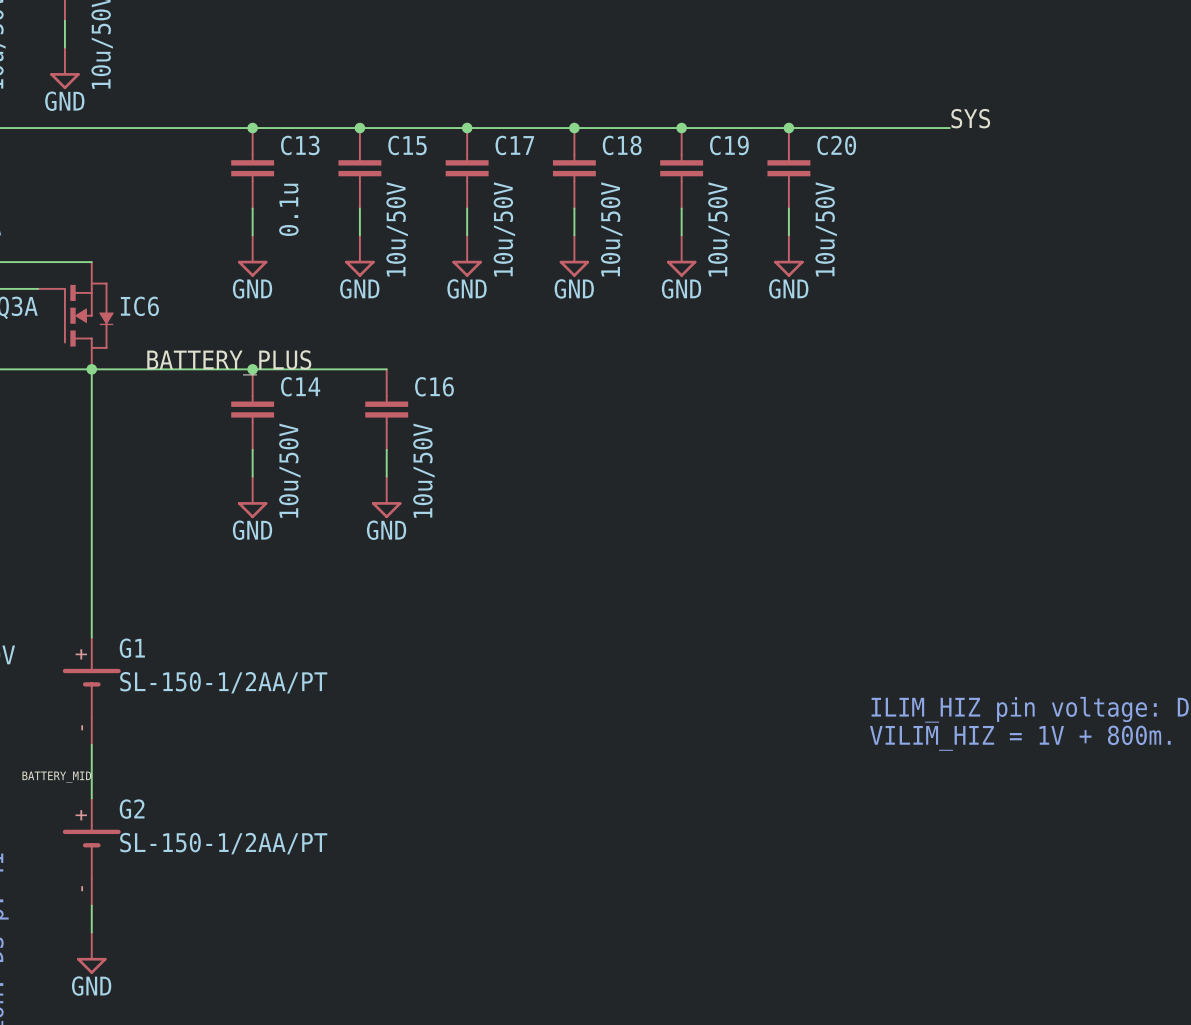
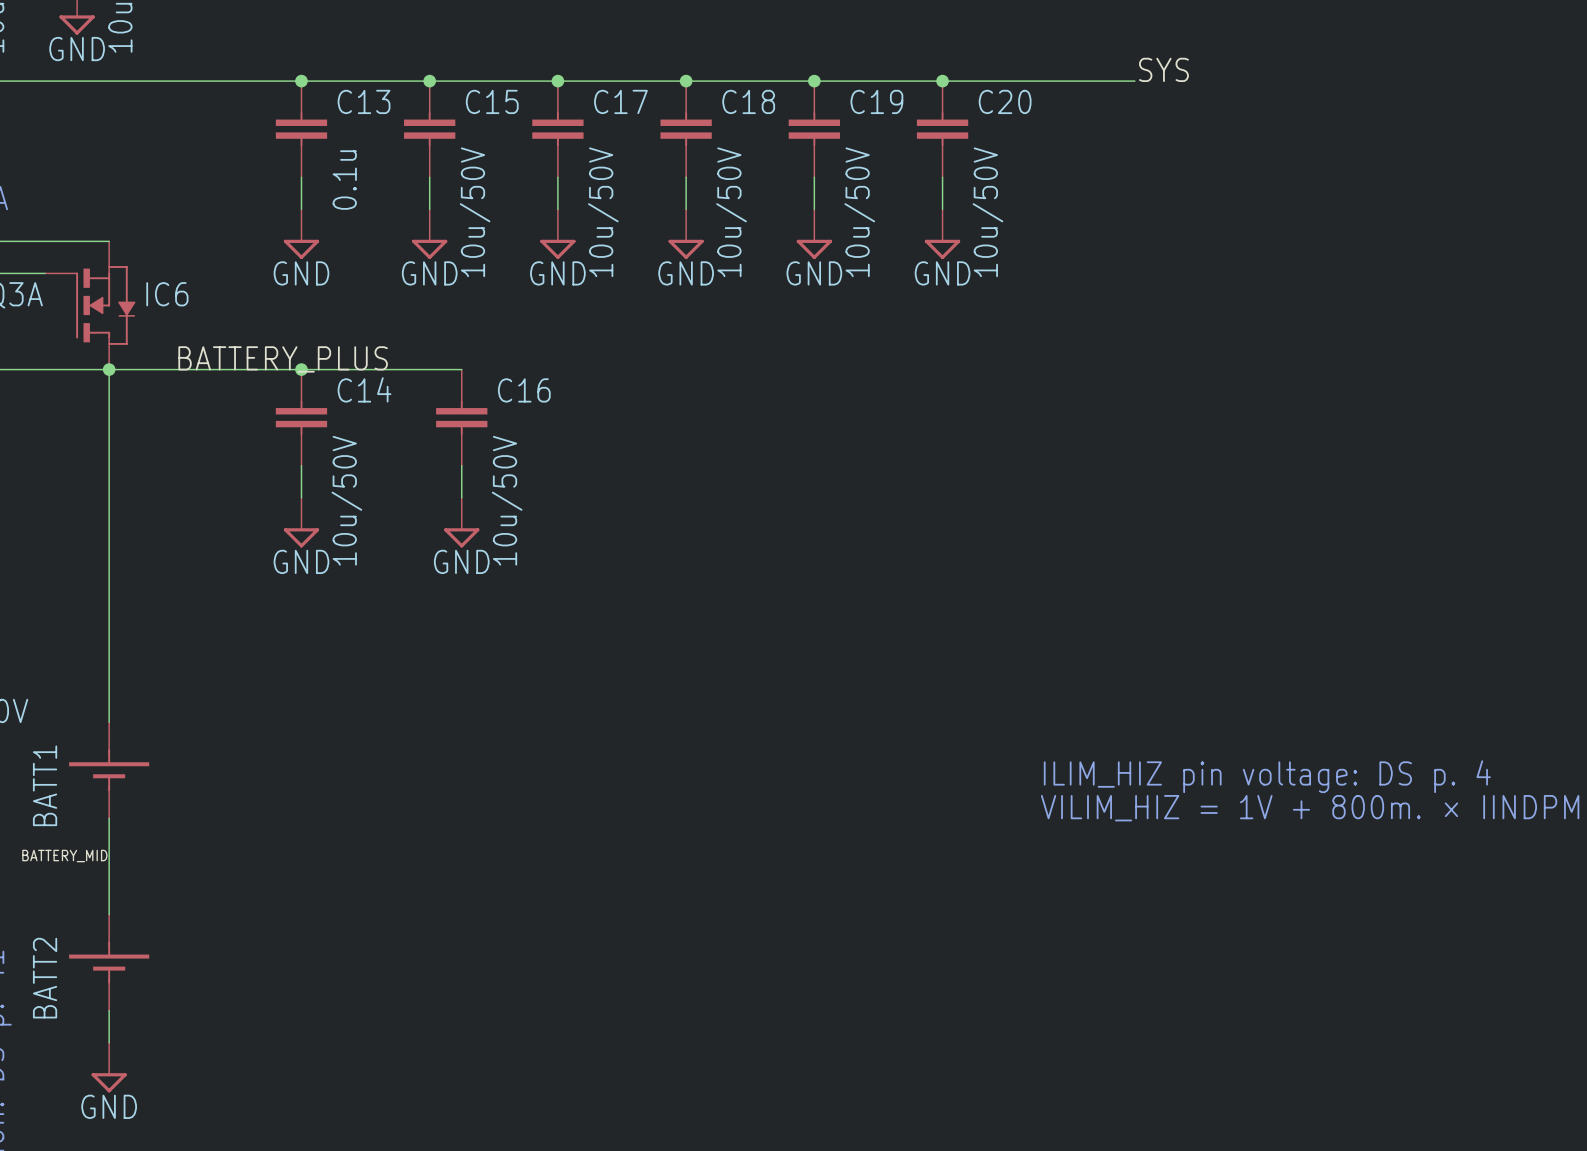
G1: SL-150-1/2AA/PT (91, 691) -> none
BATT1: none -> (109, 770)
G2: SL-150-1/2AA/PT (91, 851) -> none
BATT2: none -> (109, 962)

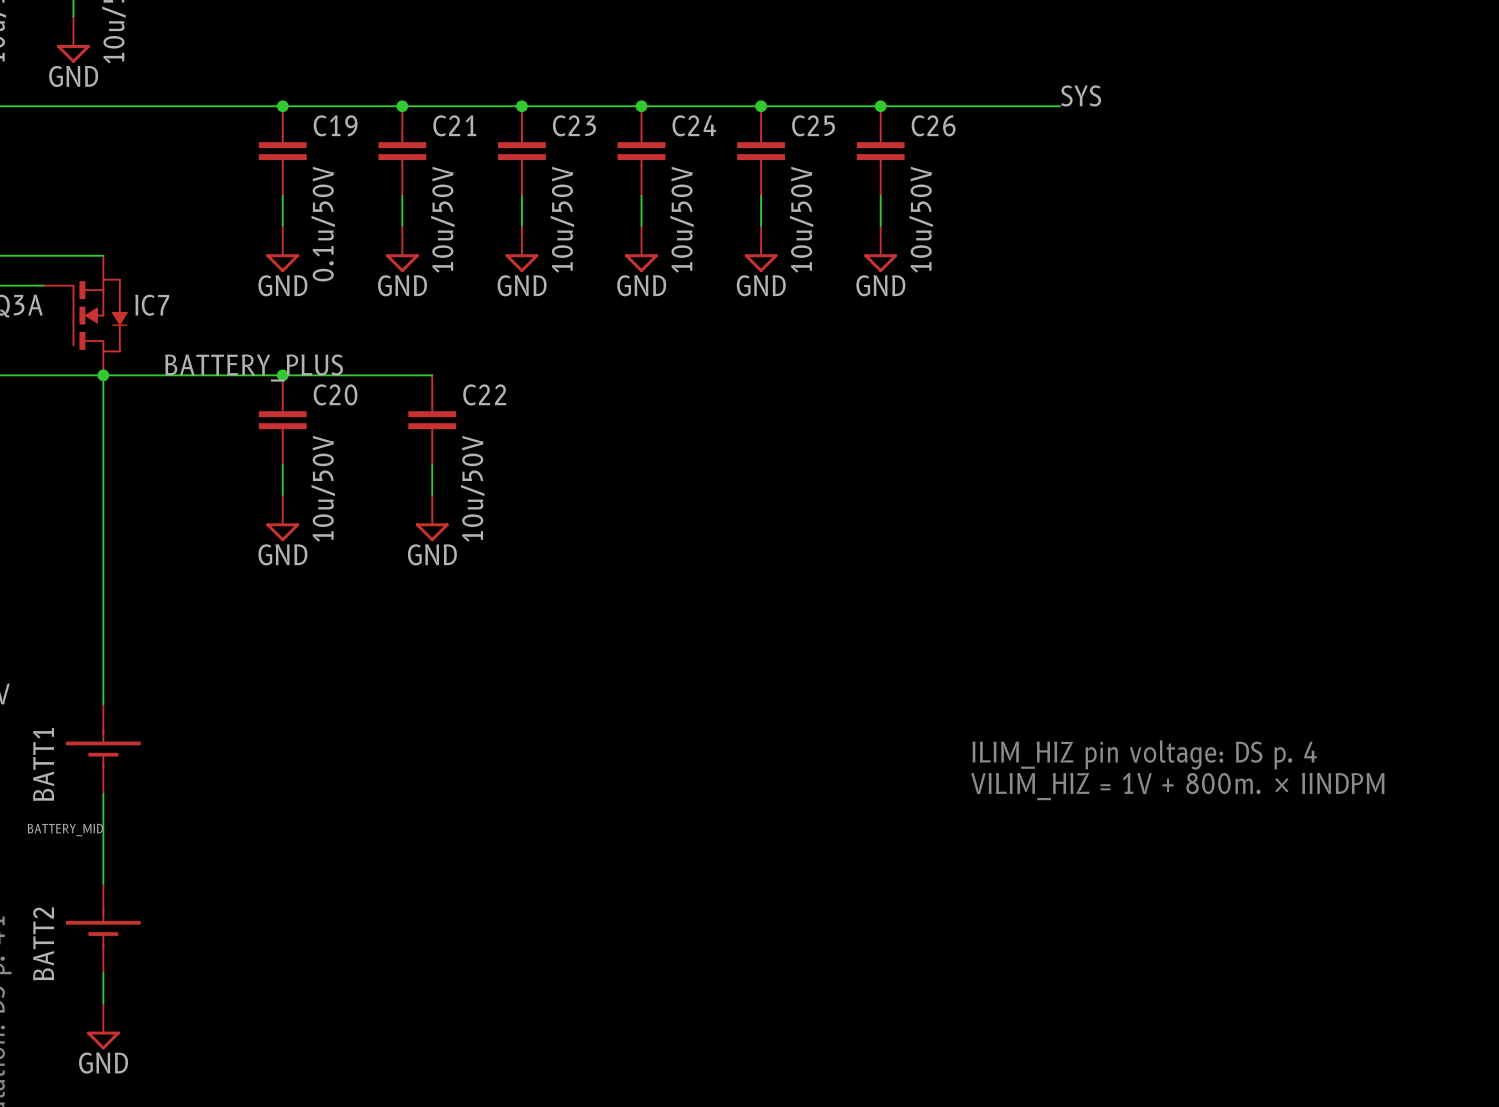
C13 name: C13 (364, 101) -> C19 (335, 125)
C15 name: C15 (492, 101) -> C21 (454, 125)
C17 name: C17 (620, 101) -> C23 (574, 125)
C18 name: C18 (748, 101) -> C24 (694, 125)
C19 name: C19 (876, 101) -> C25 (813, 125)
C20 name: C20 (1005, 101) -> C26 (933, 125)
C13 value: 0.1u (344, 180) -> 0.1u/50V (323, 224)
IC6 name: IC6 (167, 294) -> IC7 (152, 305)
C14 name: C14 (364, 389) -> C20 (335, 394)
C16 name: C16 (524, 390) -> C22 (484, 394)

